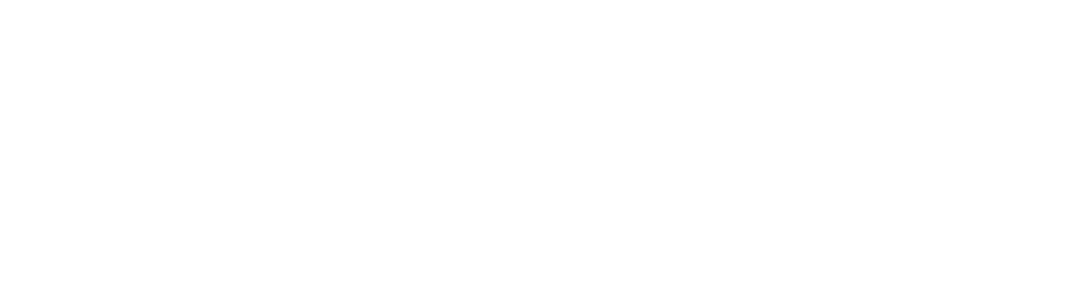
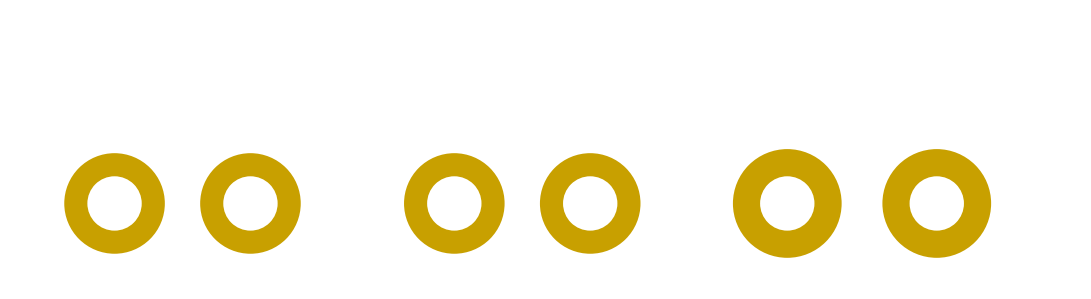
part: none -> (182, 203)
part: none -> (522, 203)
part: none -> (862, 203)

